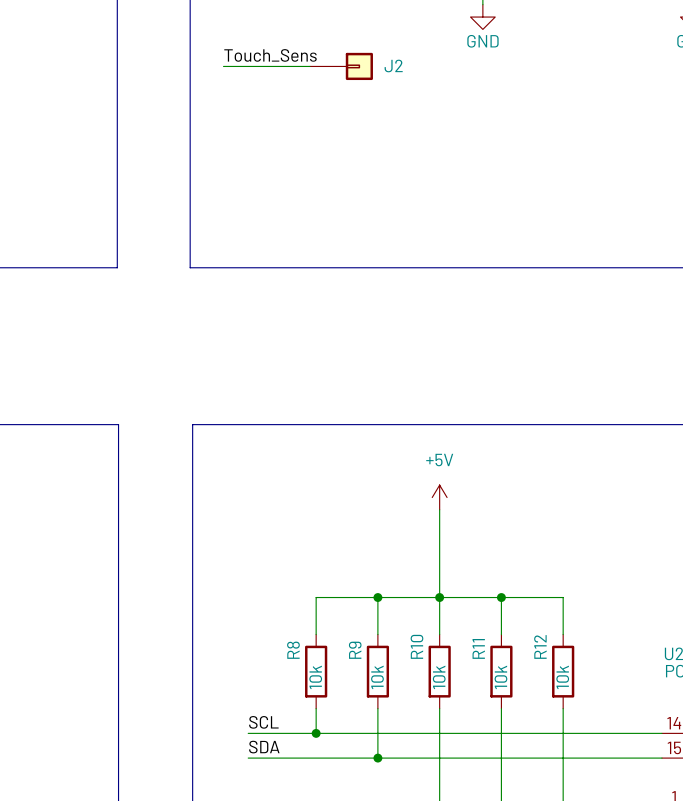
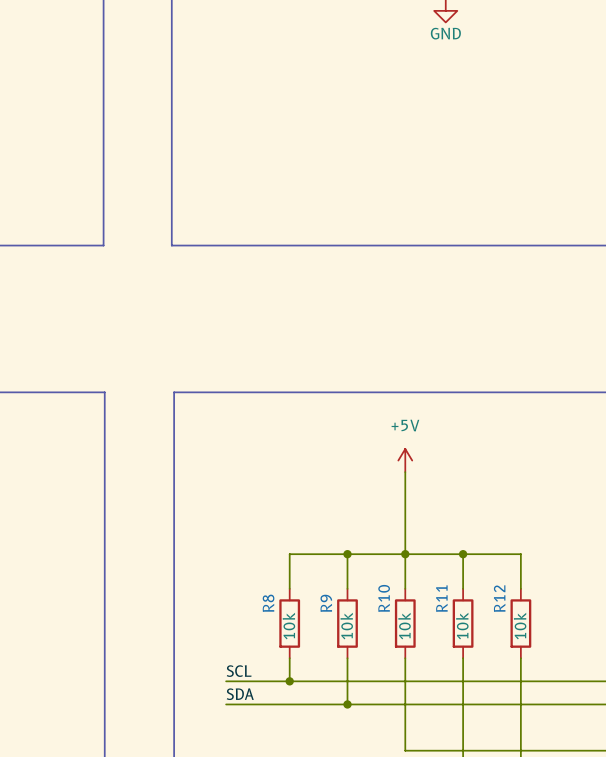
label: Touch_Sens (270, 55) -> none
wire: (223, 66) (309, 66) -> none
J2: (341, 66) -> none

